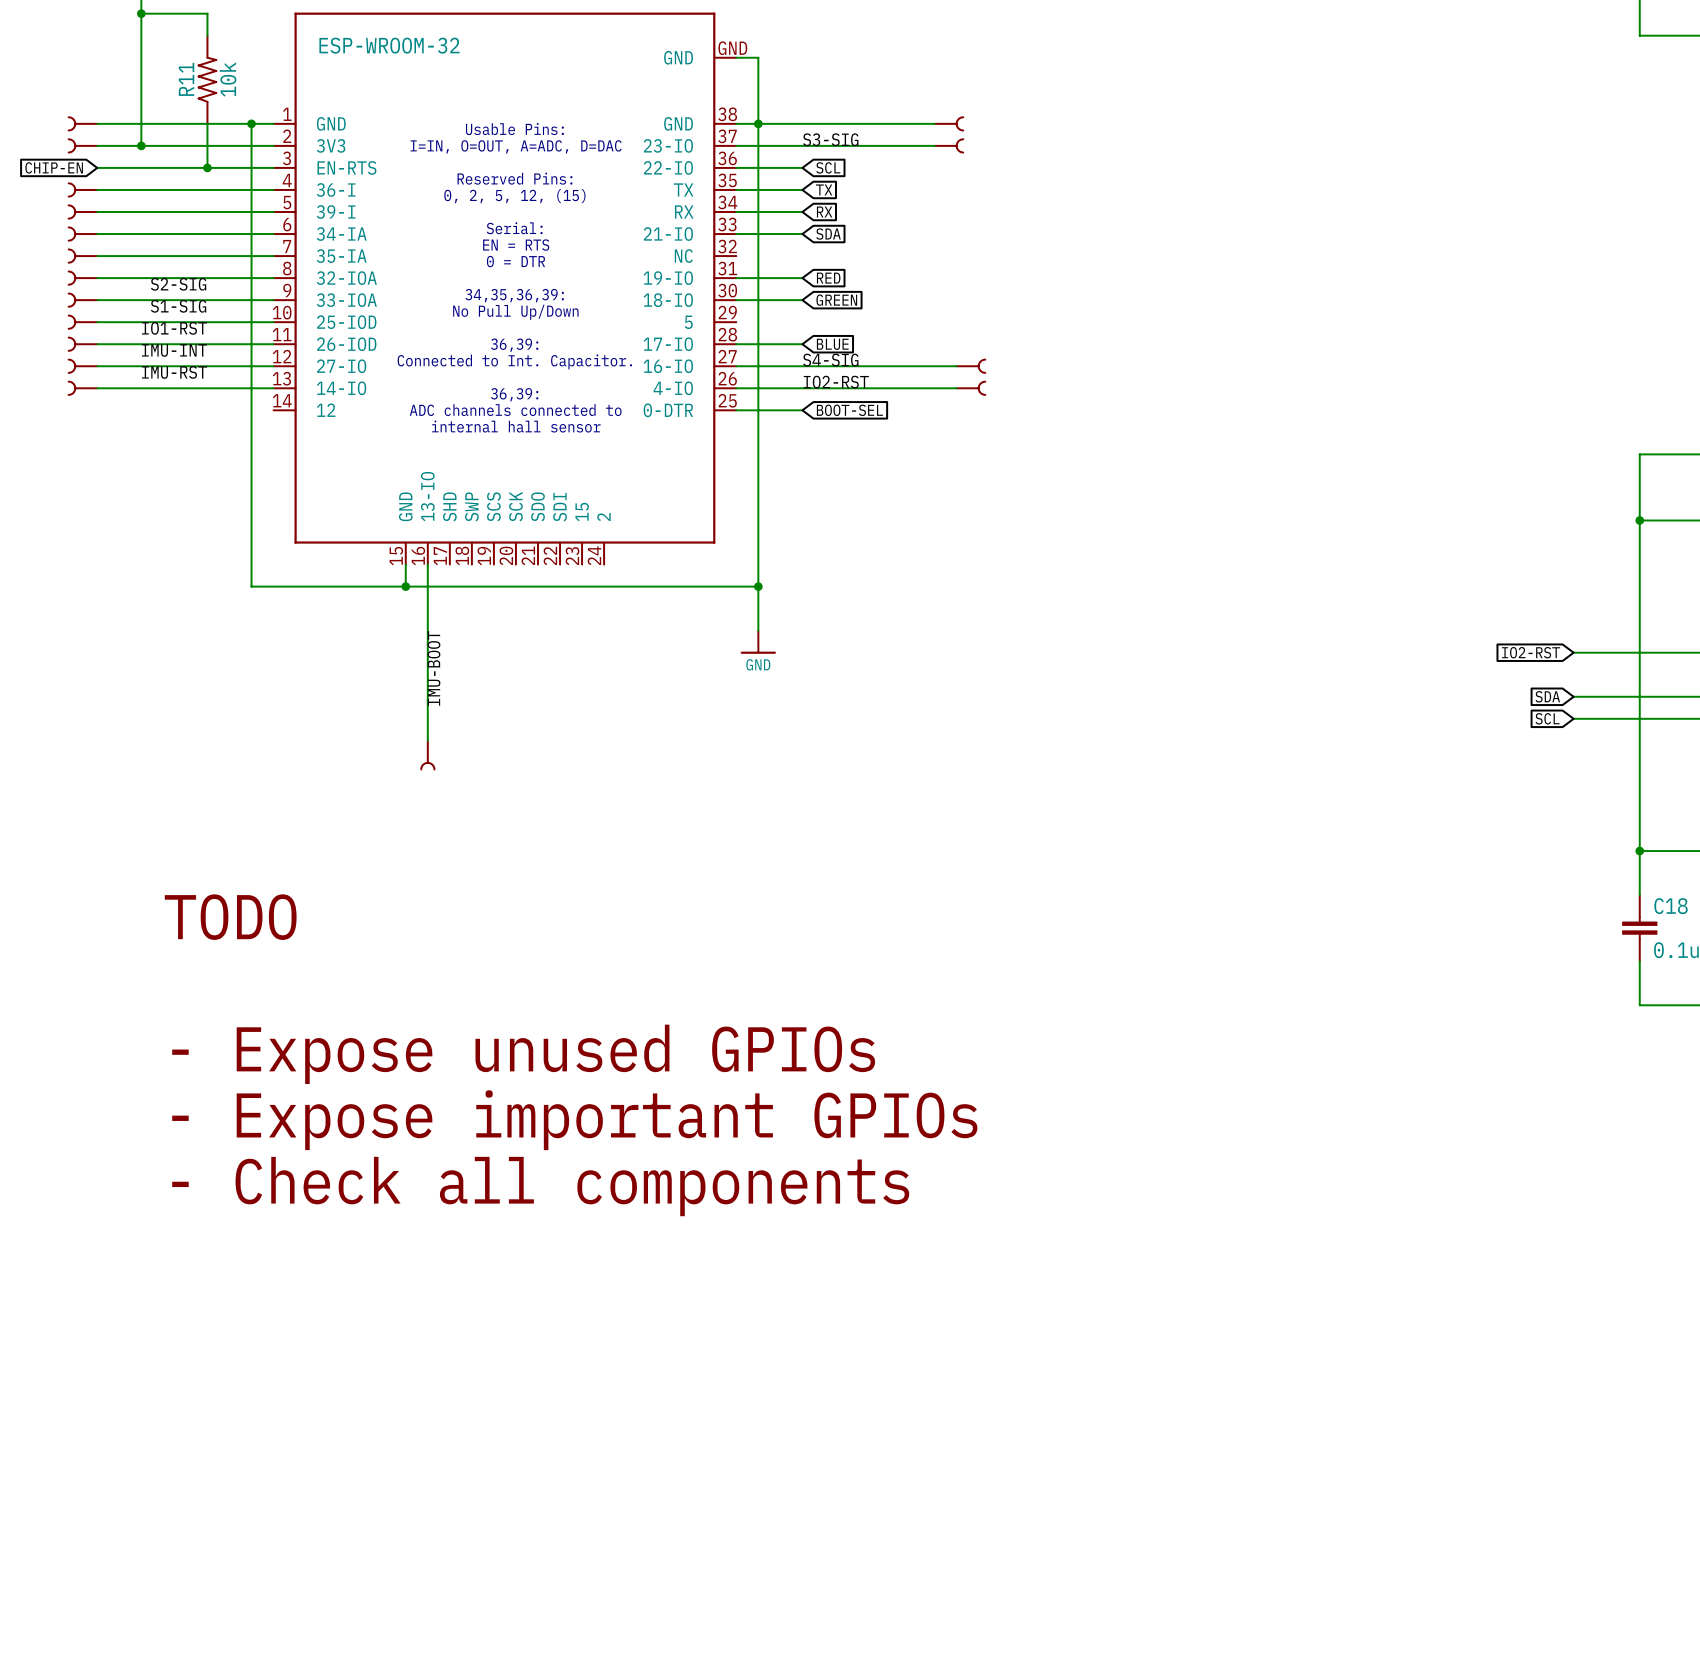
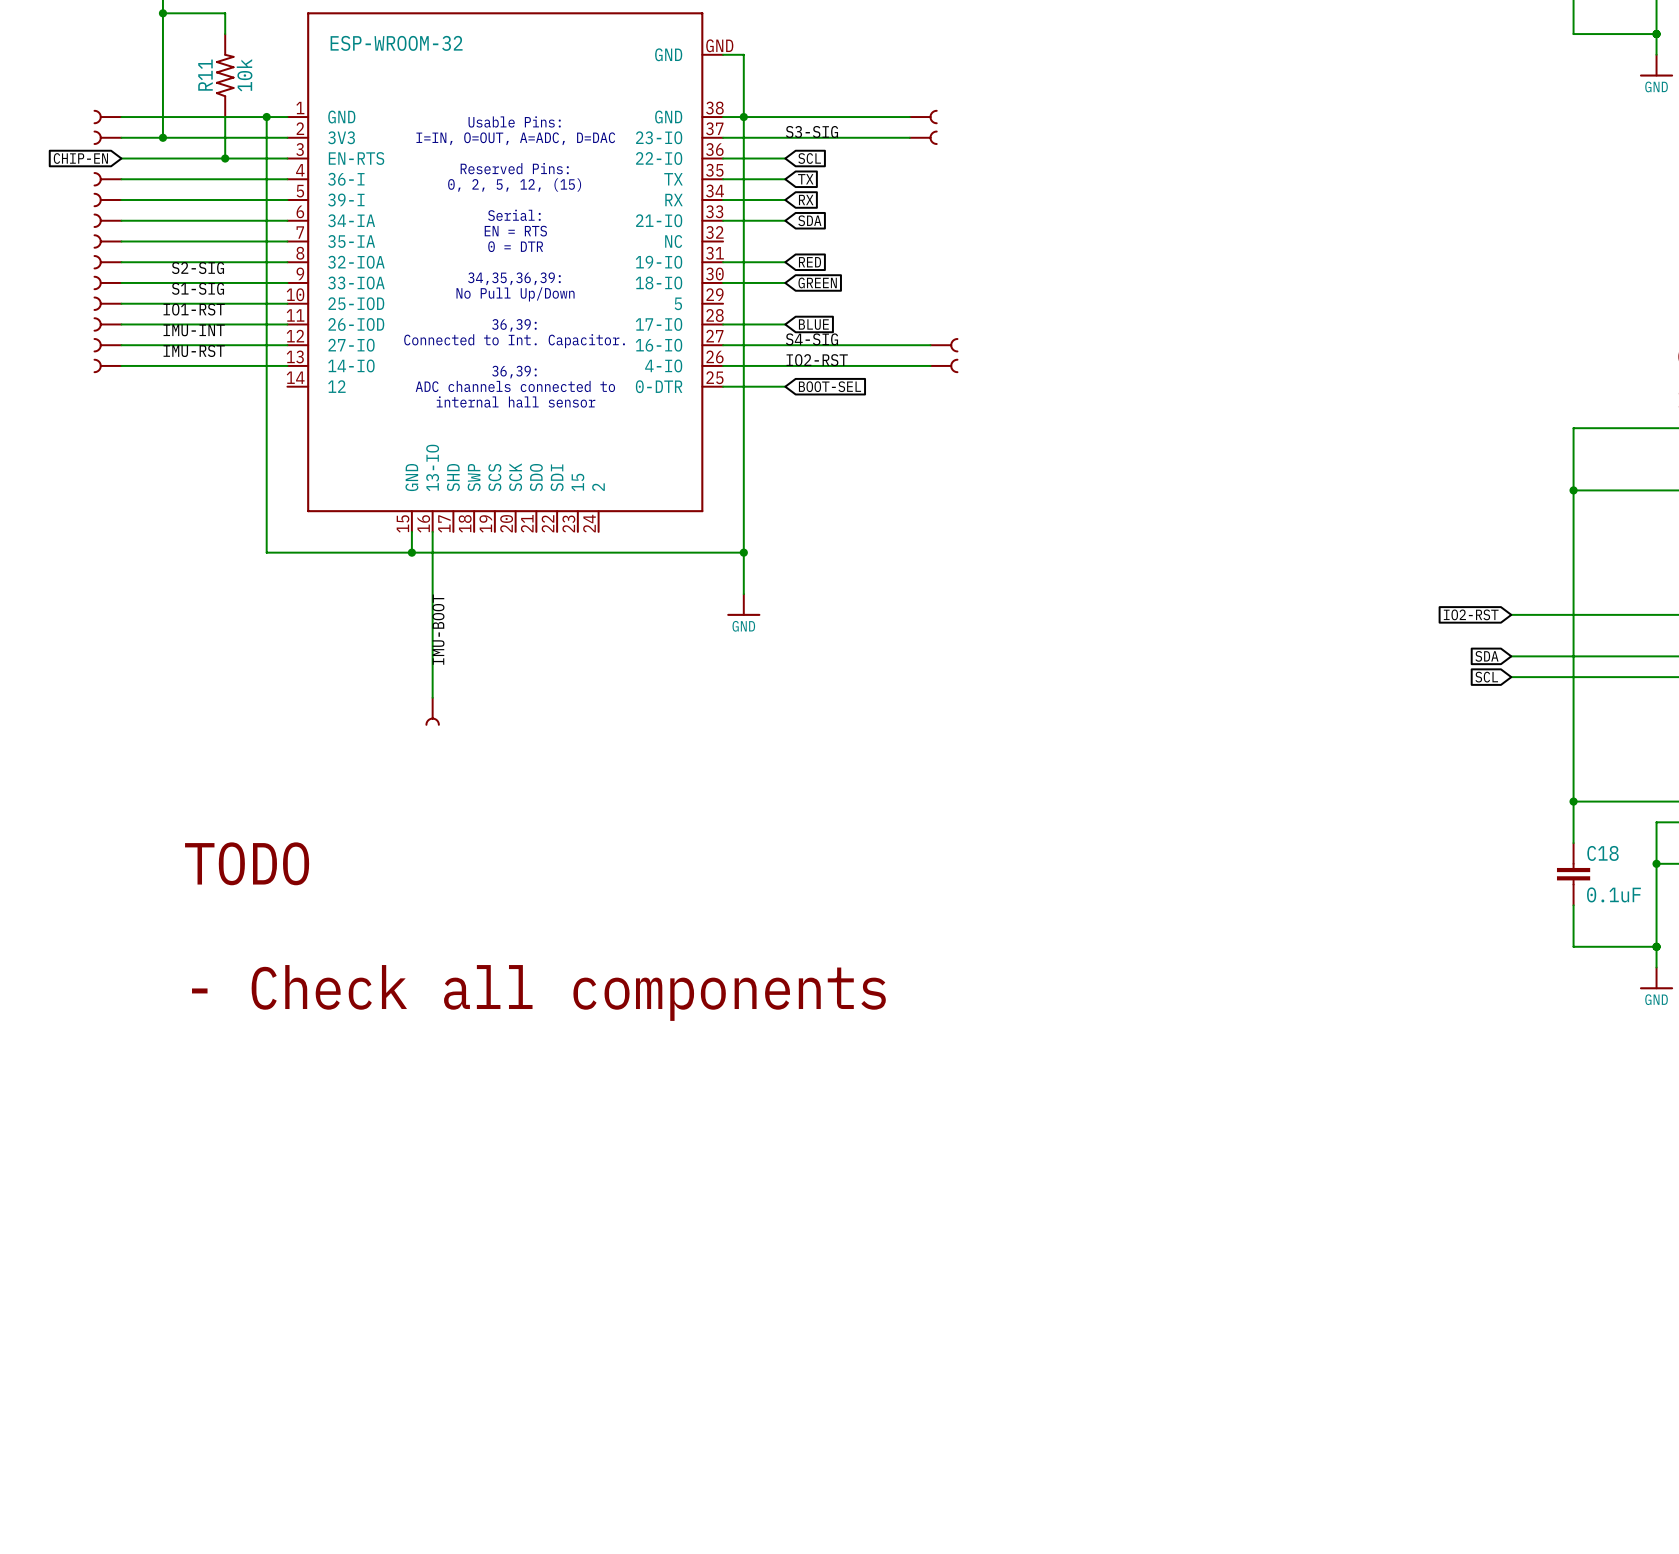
text: - Expose unused GPIOs (523, 1054) -> - Check all components (538, 992)
text: - Expose important GPIOs (574, 1120) -> none
text: - Check all components (540, 1186) -> none

